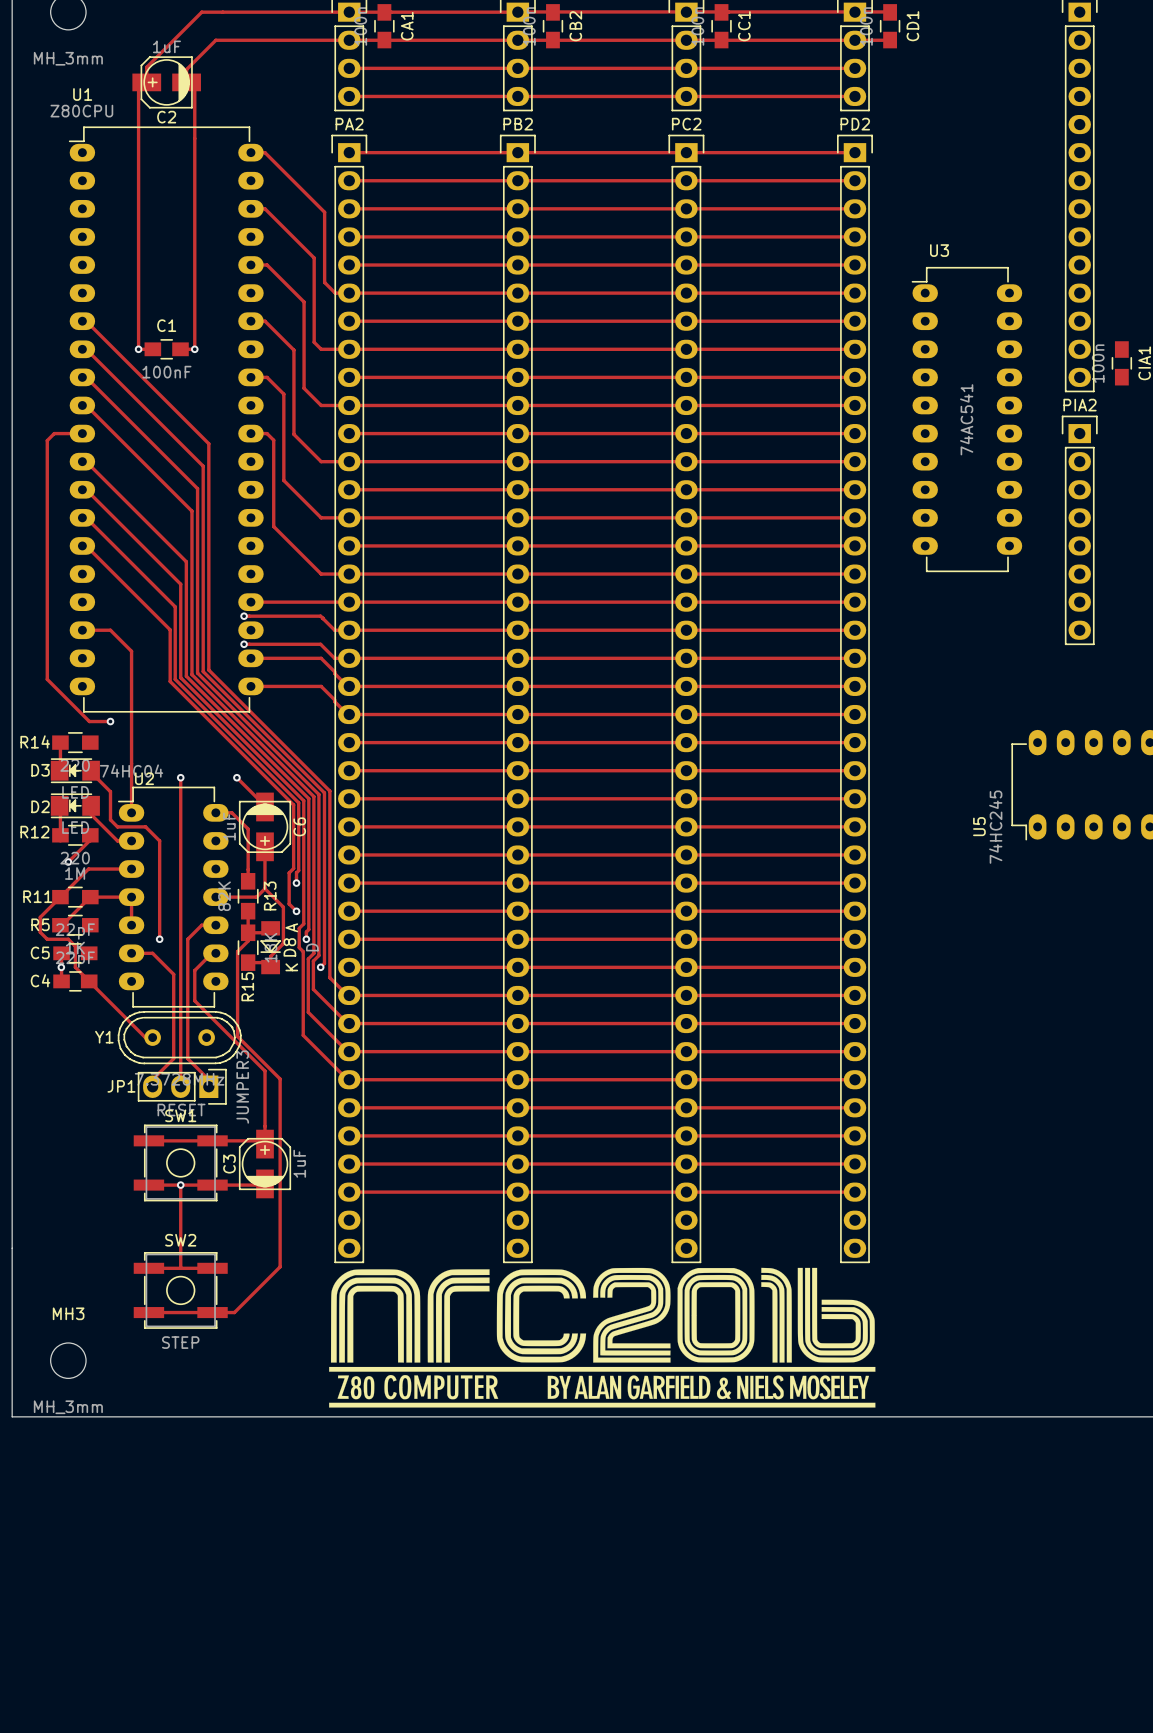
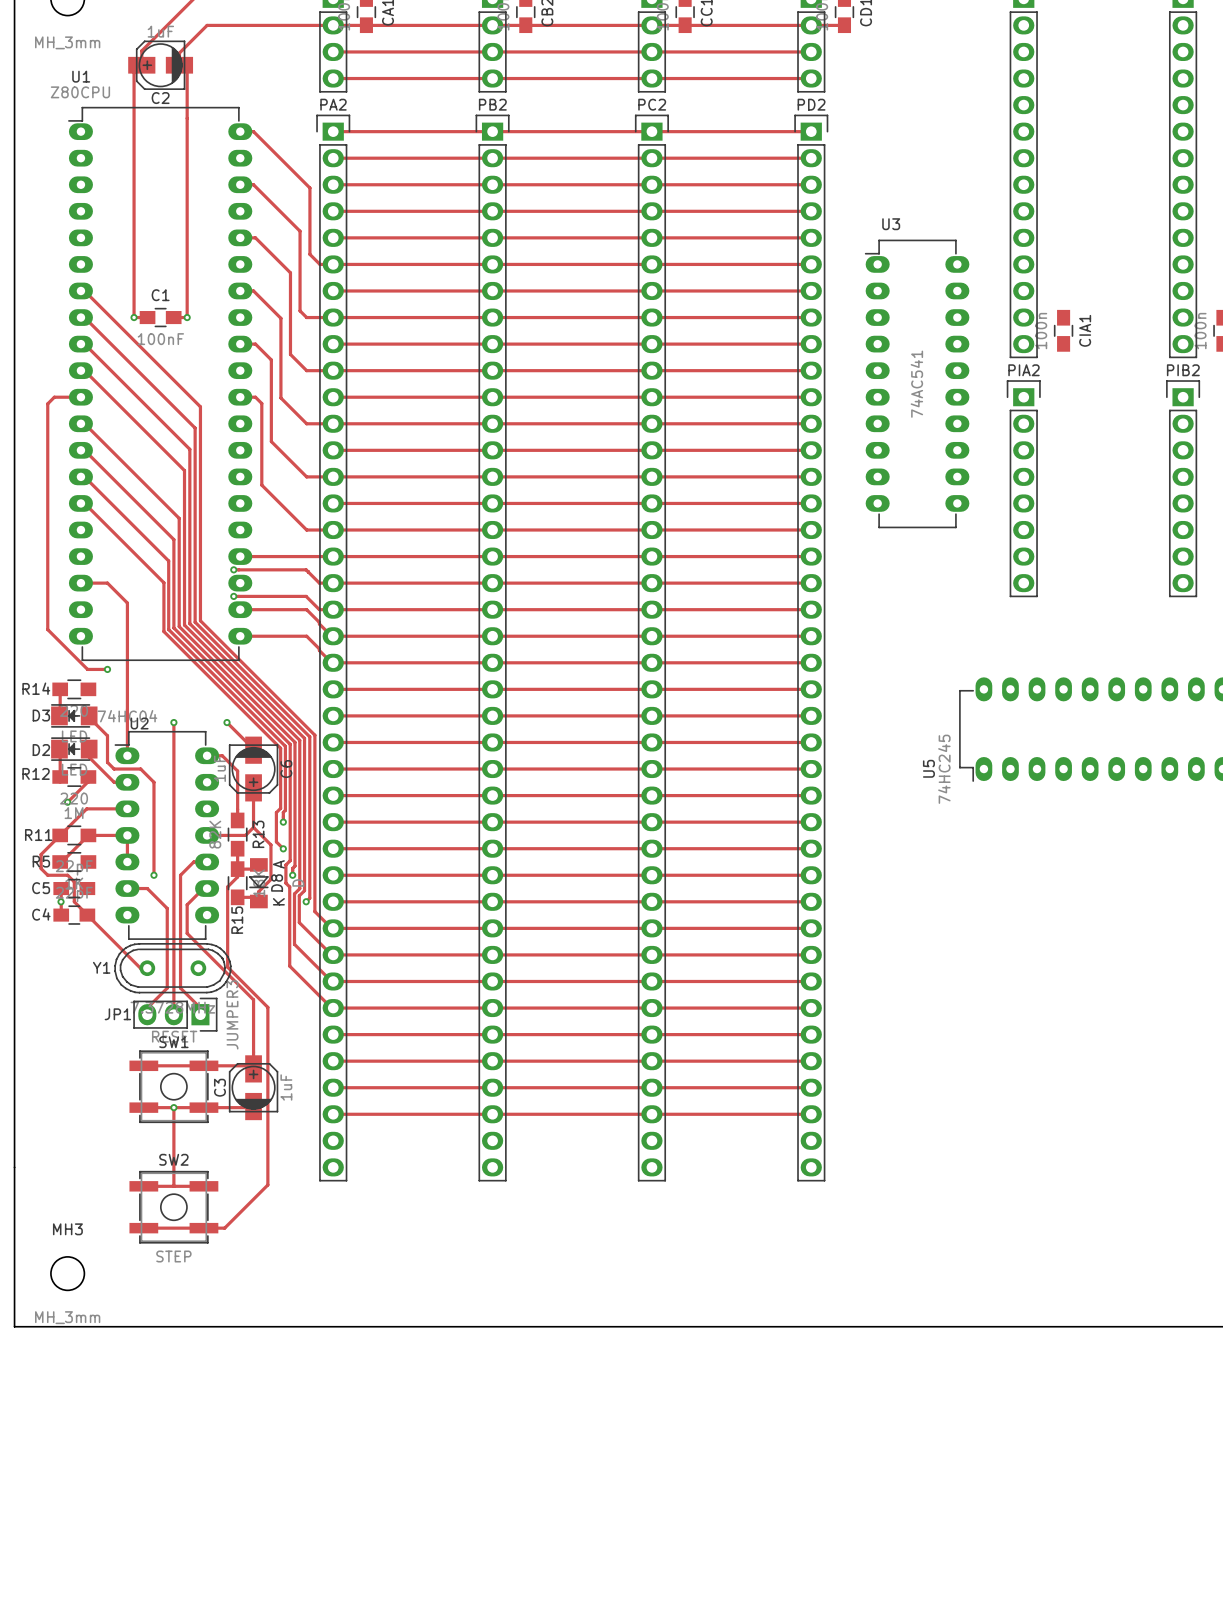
drawing: [329, 1267, 876, 1408] -> none

